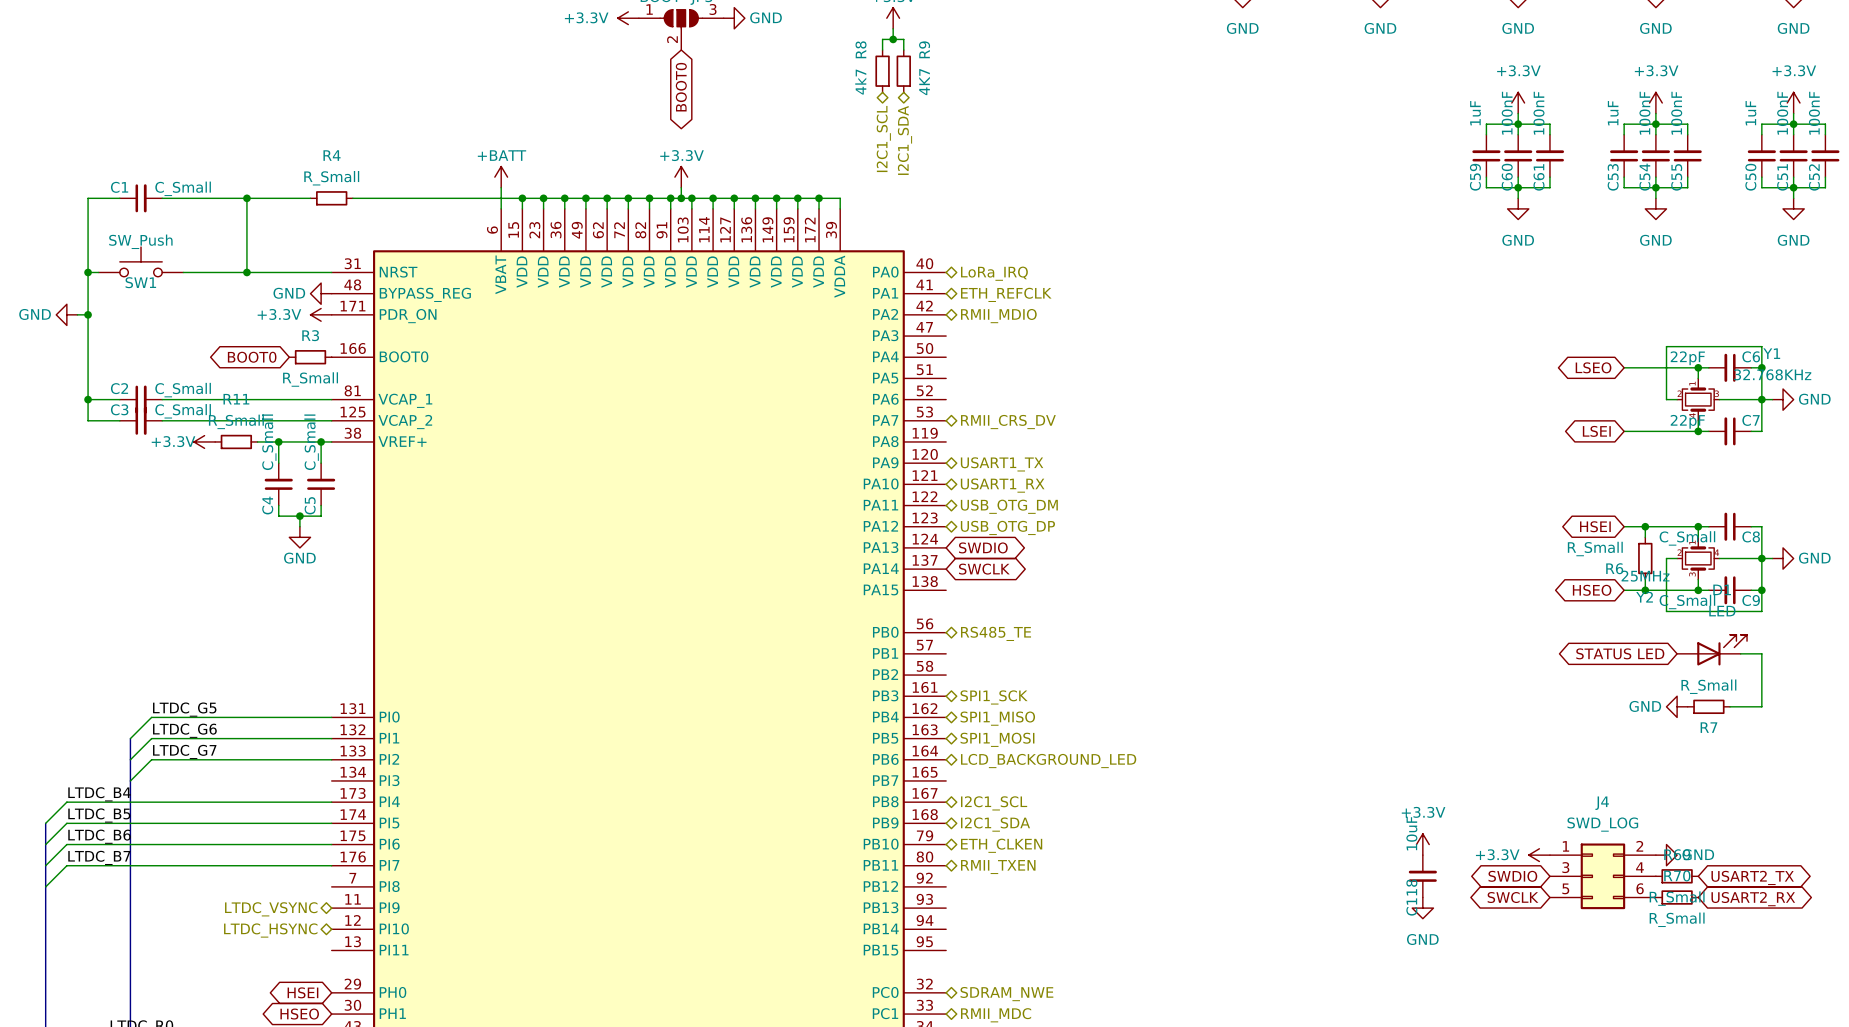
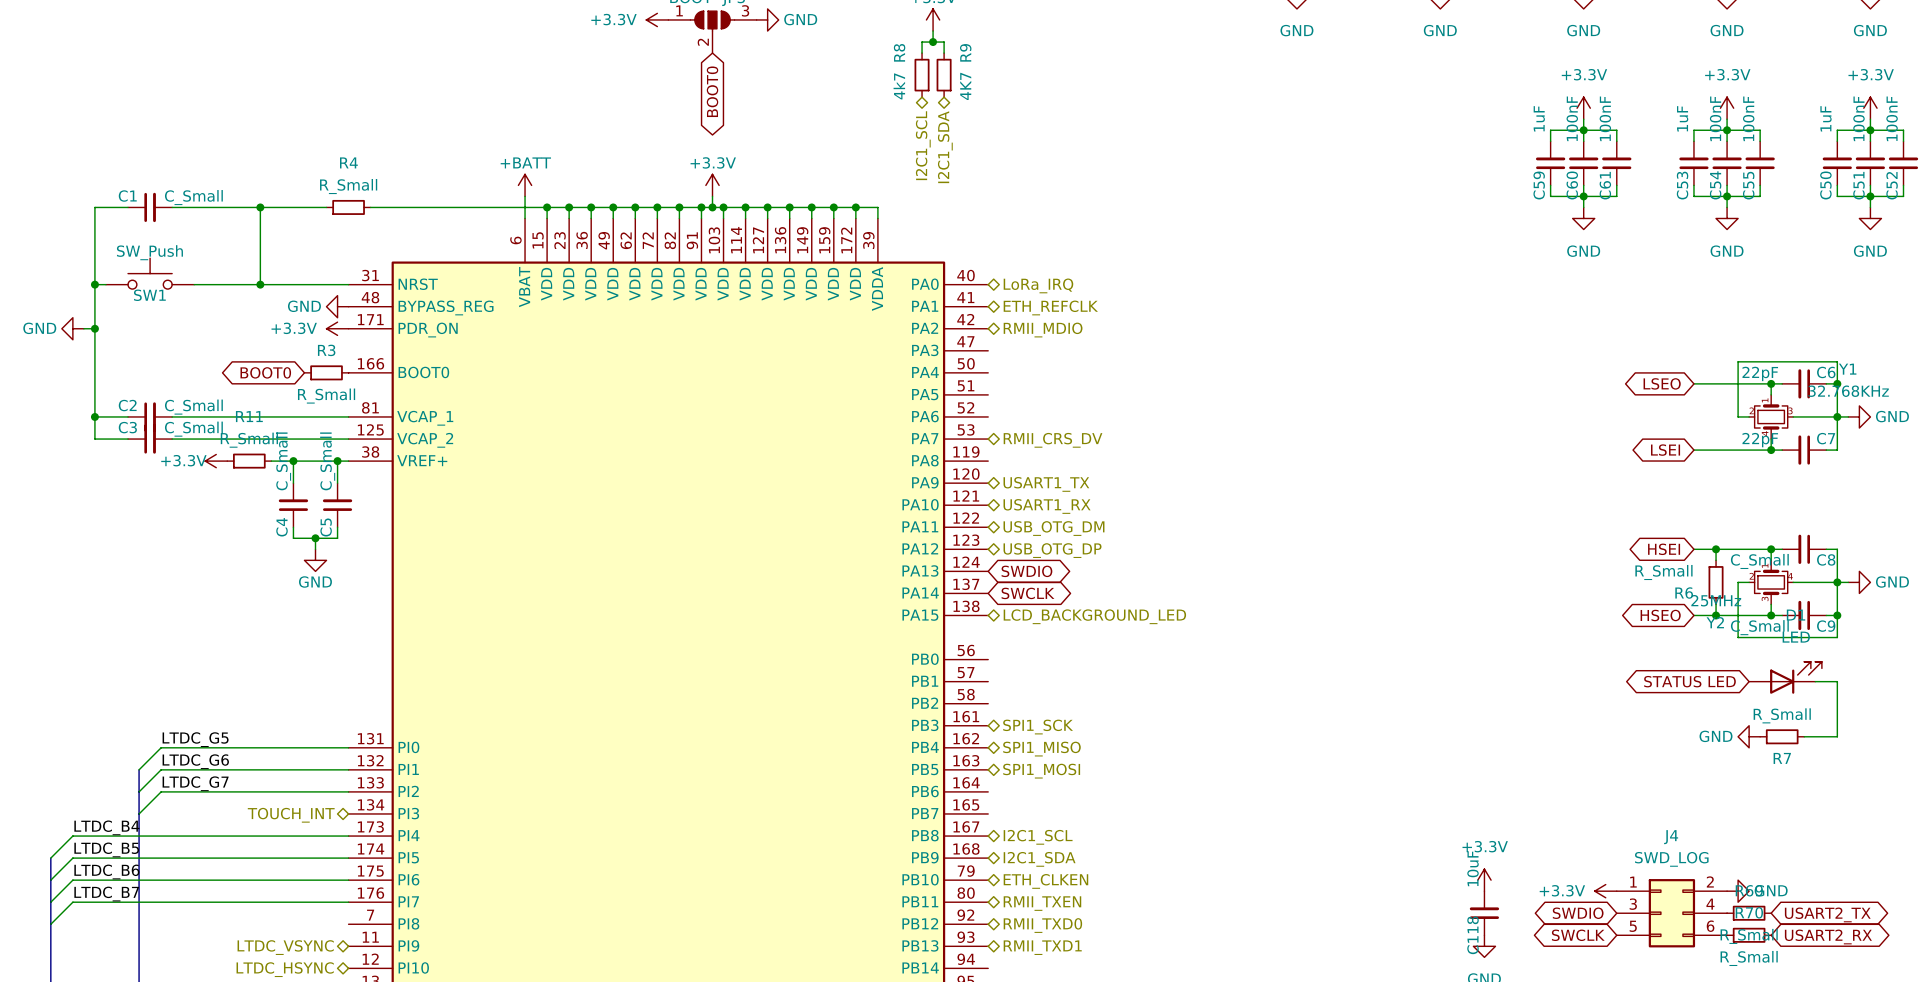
hierarchical label: RS485_TE (996, 633) -> none
hierarchical label position: LCD_BACKGROUND_LED (1048, 761) -> LCD_BACKGROUND_LED (1094, 616)
hierarchical label: none -> TOUCH_INT (291, 815)
hierarchical label: none -> RMII_TXD0 (1042, 925)
hierarchical label: none -> RMII_TXD1 (1042, 947)

